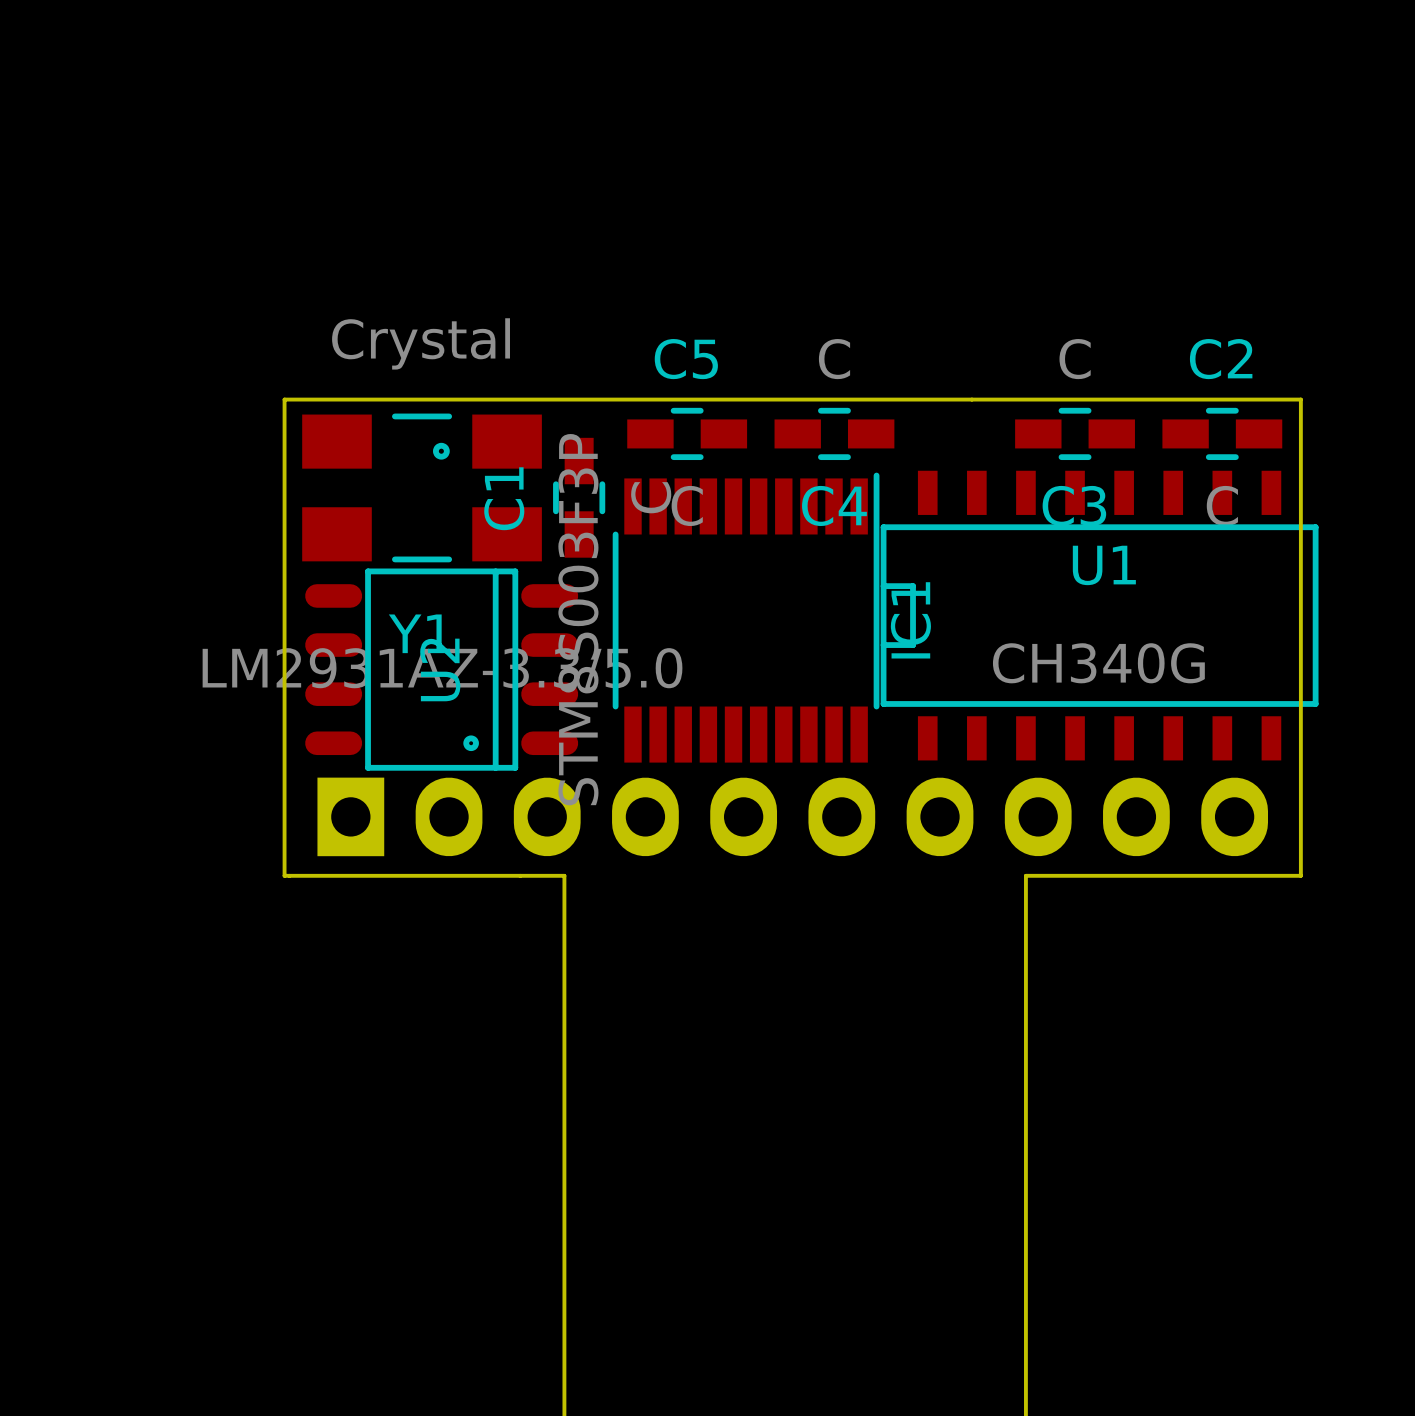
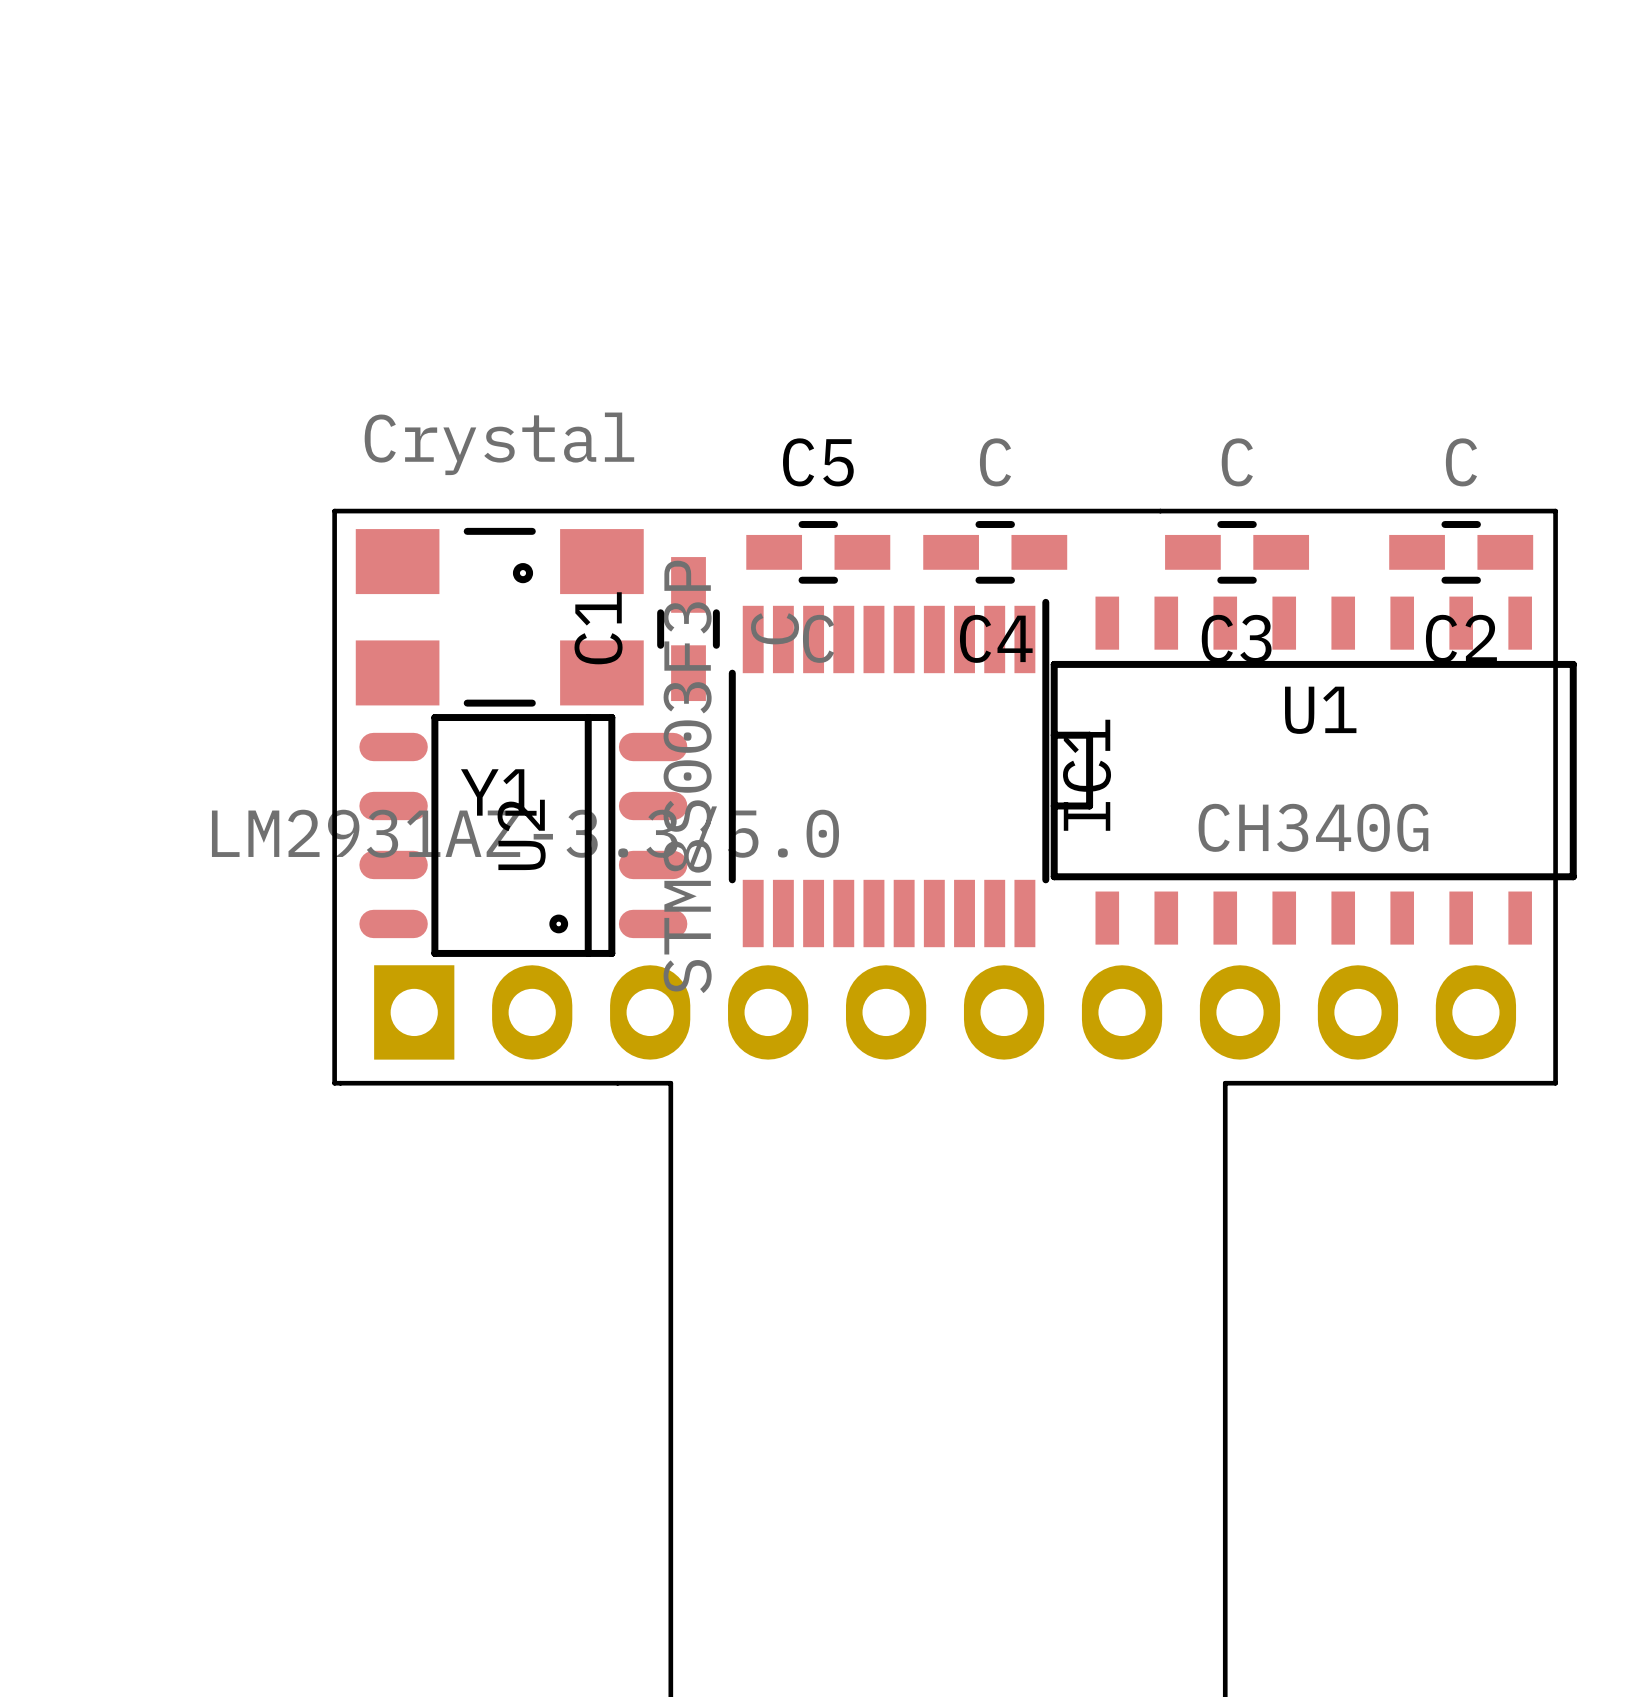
C2 name position: C2 (1221, 359) -> C2 (1461, 638)
C3 position: (1075, 433) -> (1237, 552)
C2 value position: C (1222, 505) -> C (1461, 462)

